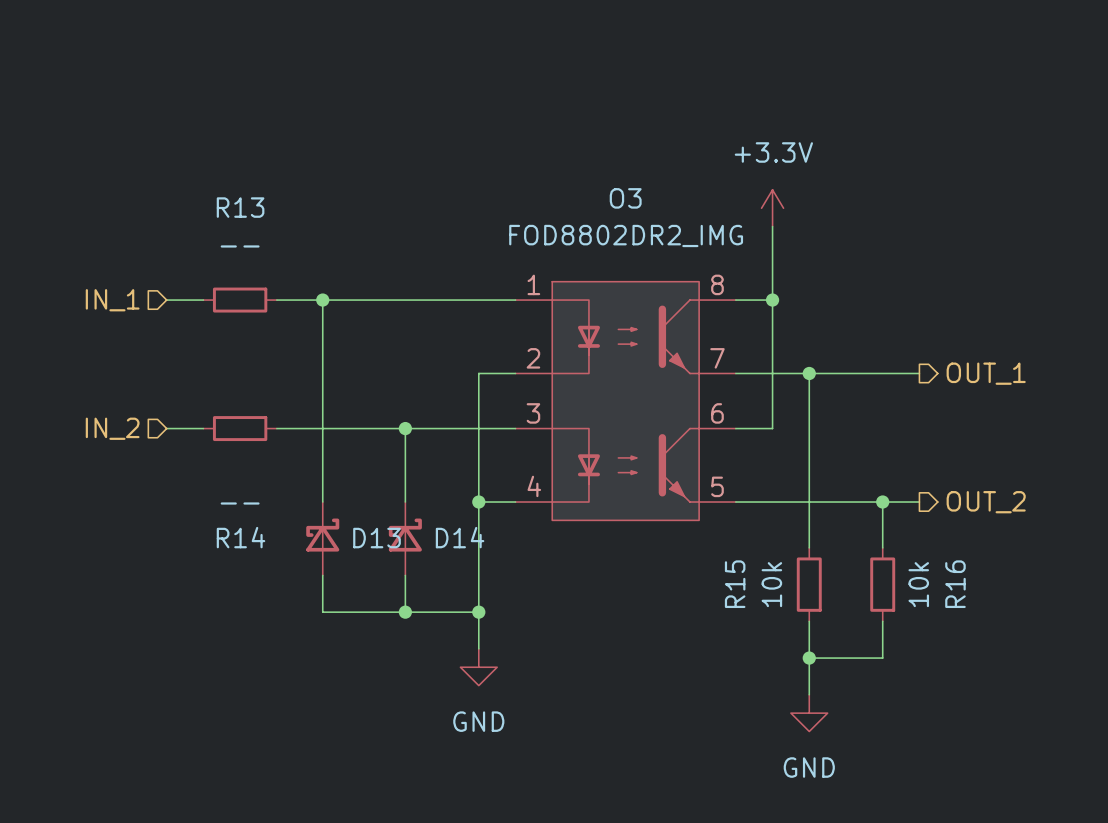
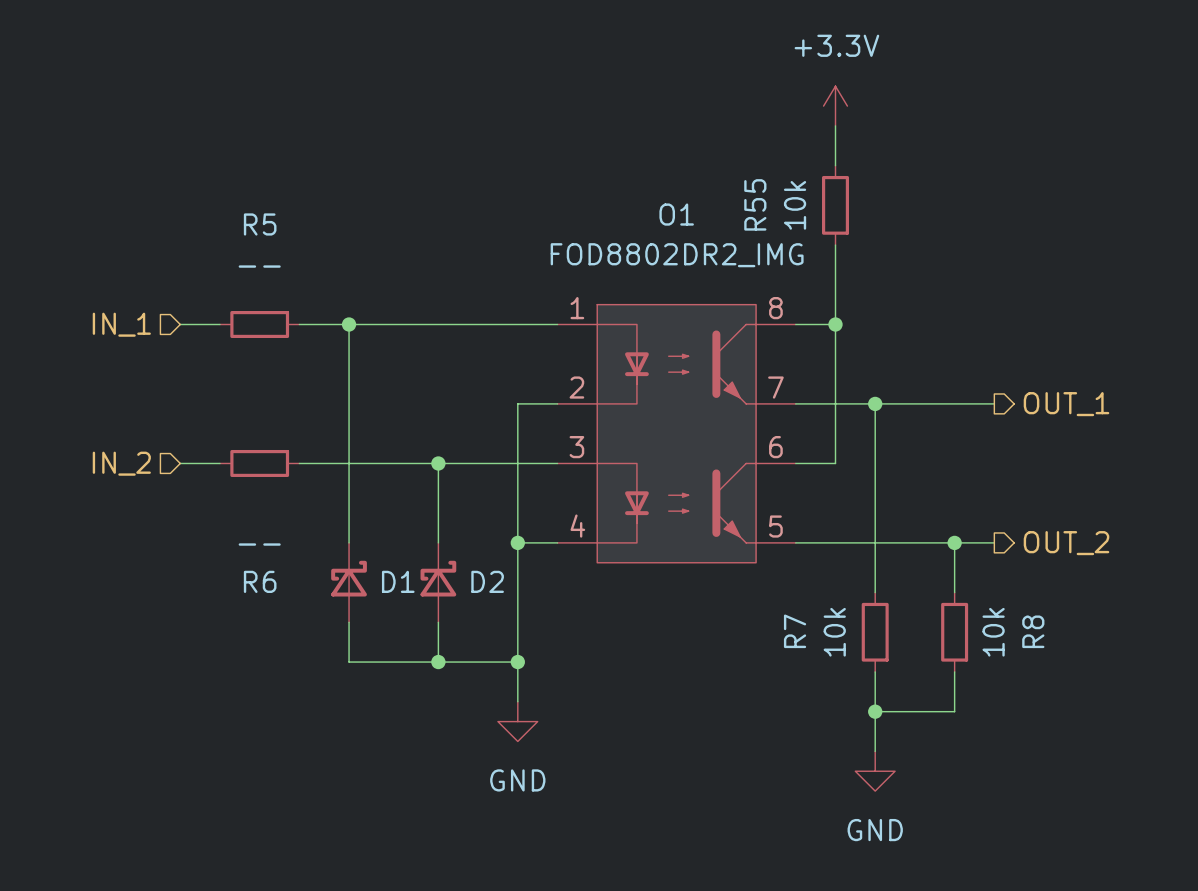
wire: none -> (835, 125) (835, 165)
R55: none -> 10k (835, 205)
O3 name: O3 (625, 198) -> O1 (676, 214)
R13 name: R13 (240, 207) -> R5 (260, 224)
power symbol position: +3.3V (772, 208) -> +3.3V (835, 106)
R14 name: R14 (241, 537) -> R6 (260, 581)
D14 name: D14 (460, 537) -> D2 (487, 581)
D13 name: D13 (377, 538) -> D1 (398, 581)
R15 name: R15 (735, 584) -> R7 (795, 631)
R16 name: R16 (955, 584) -> R8 (1033, 631)

